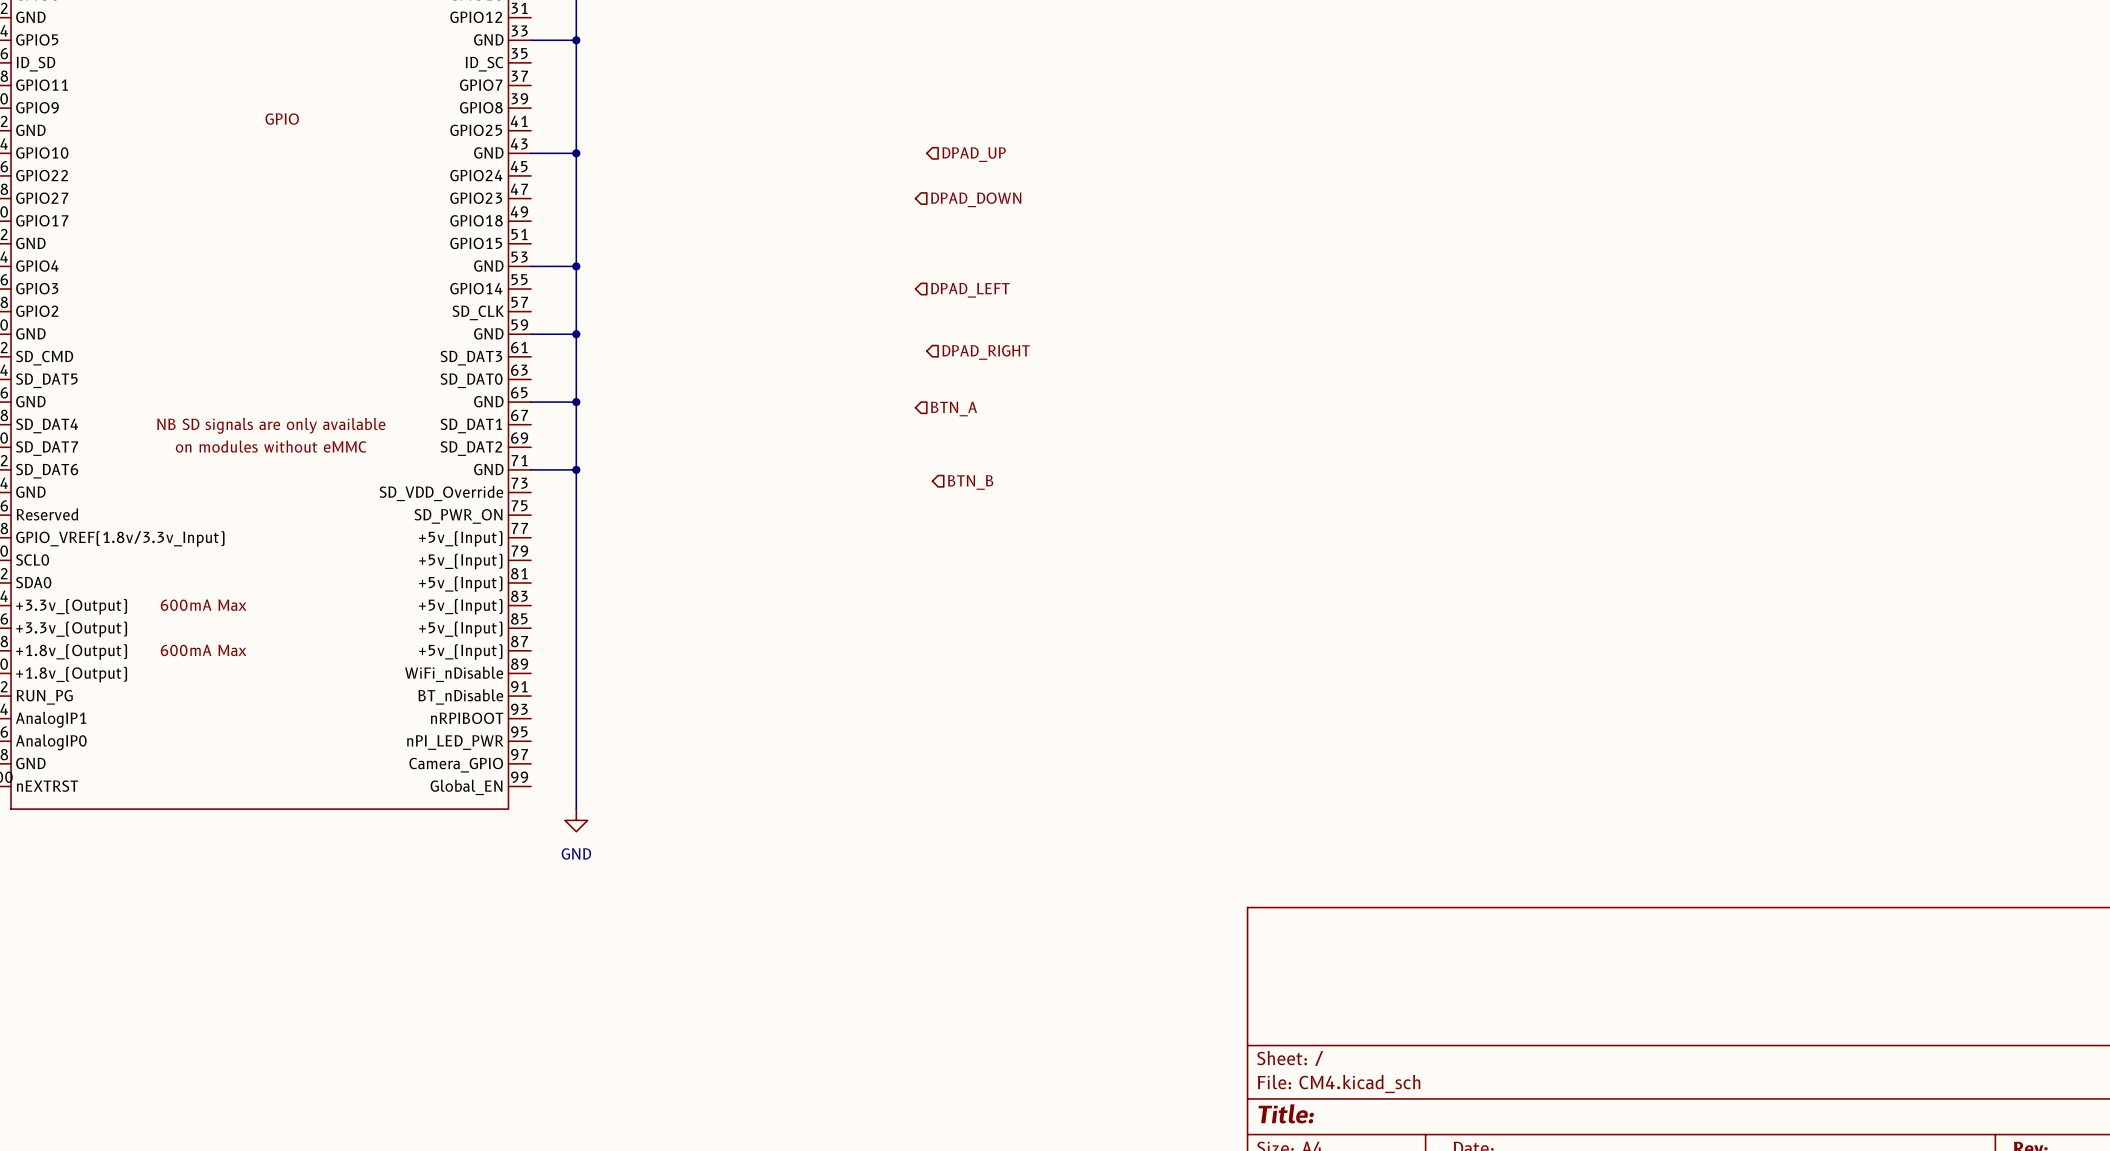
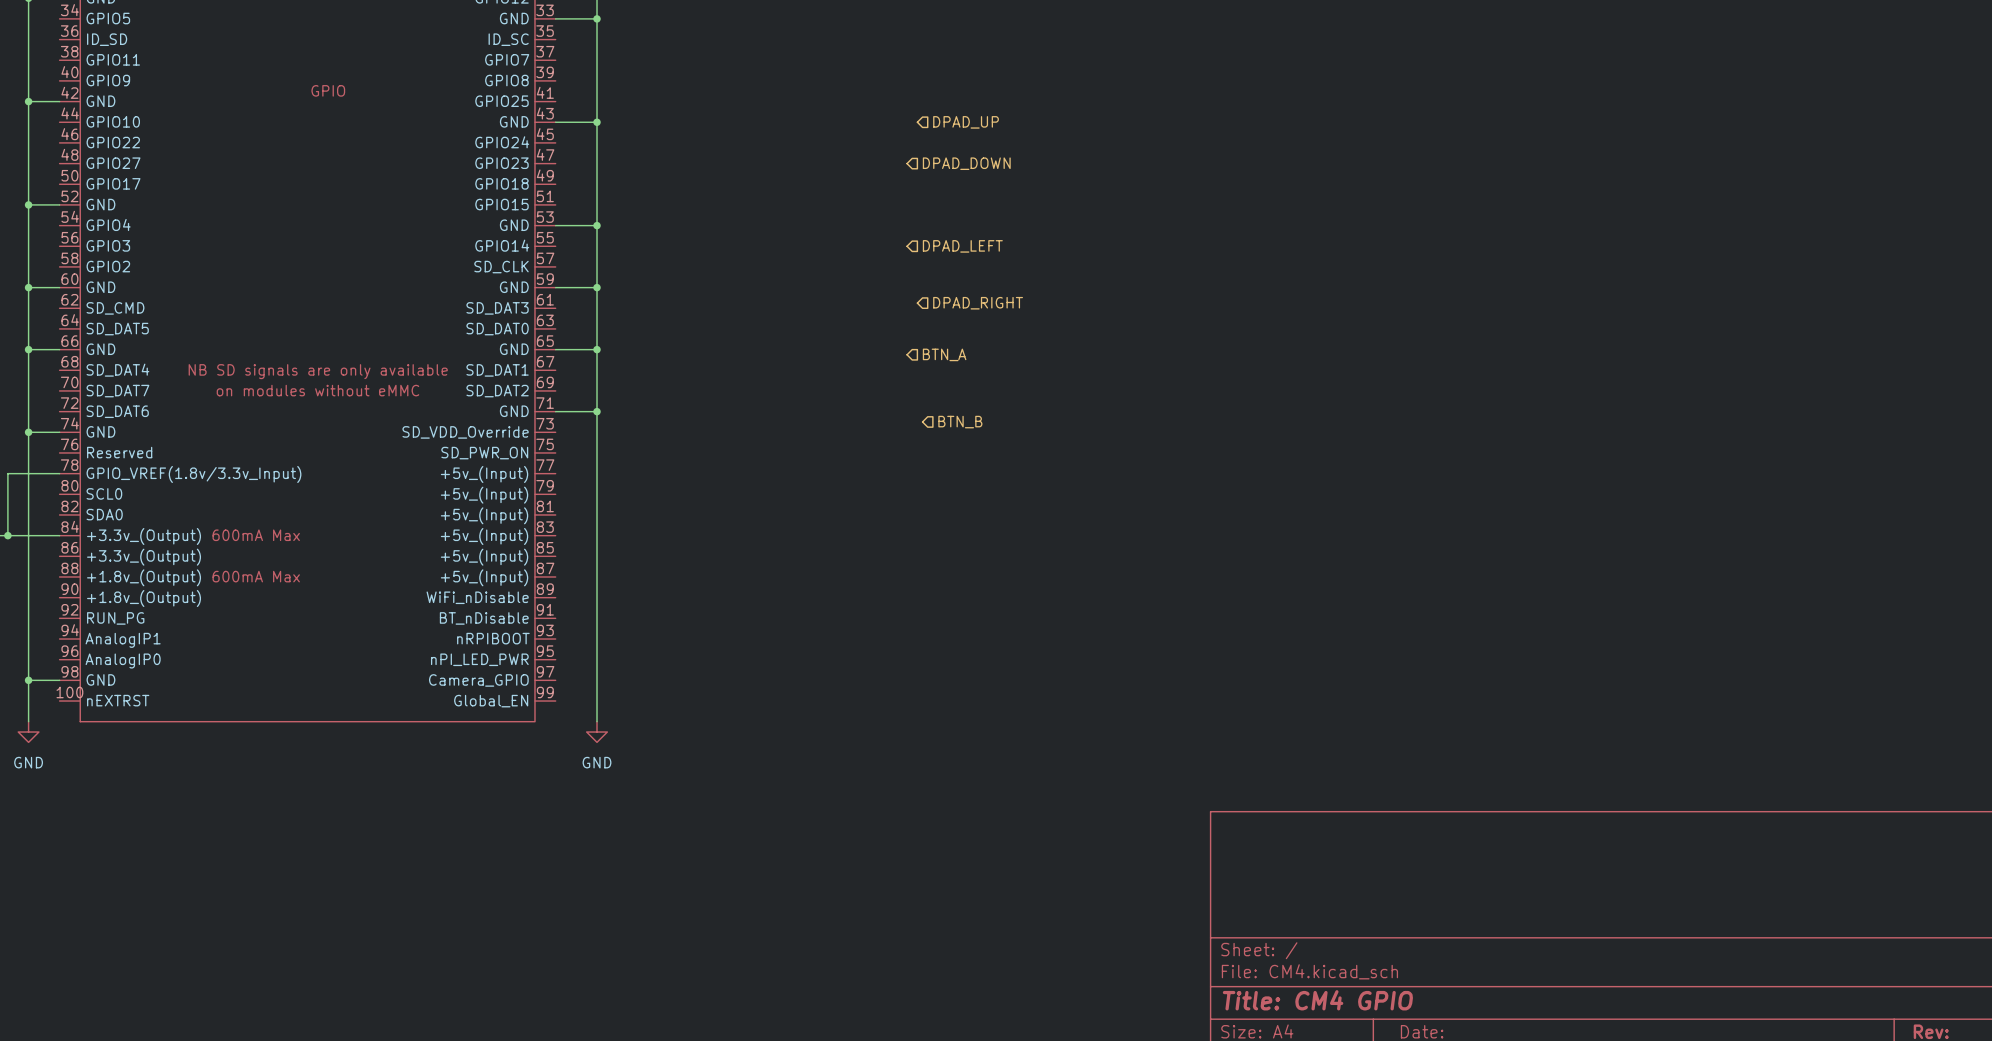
title block: Title: (1286, 1113) -> Title: CM4 GPIO (1317, 1000)

